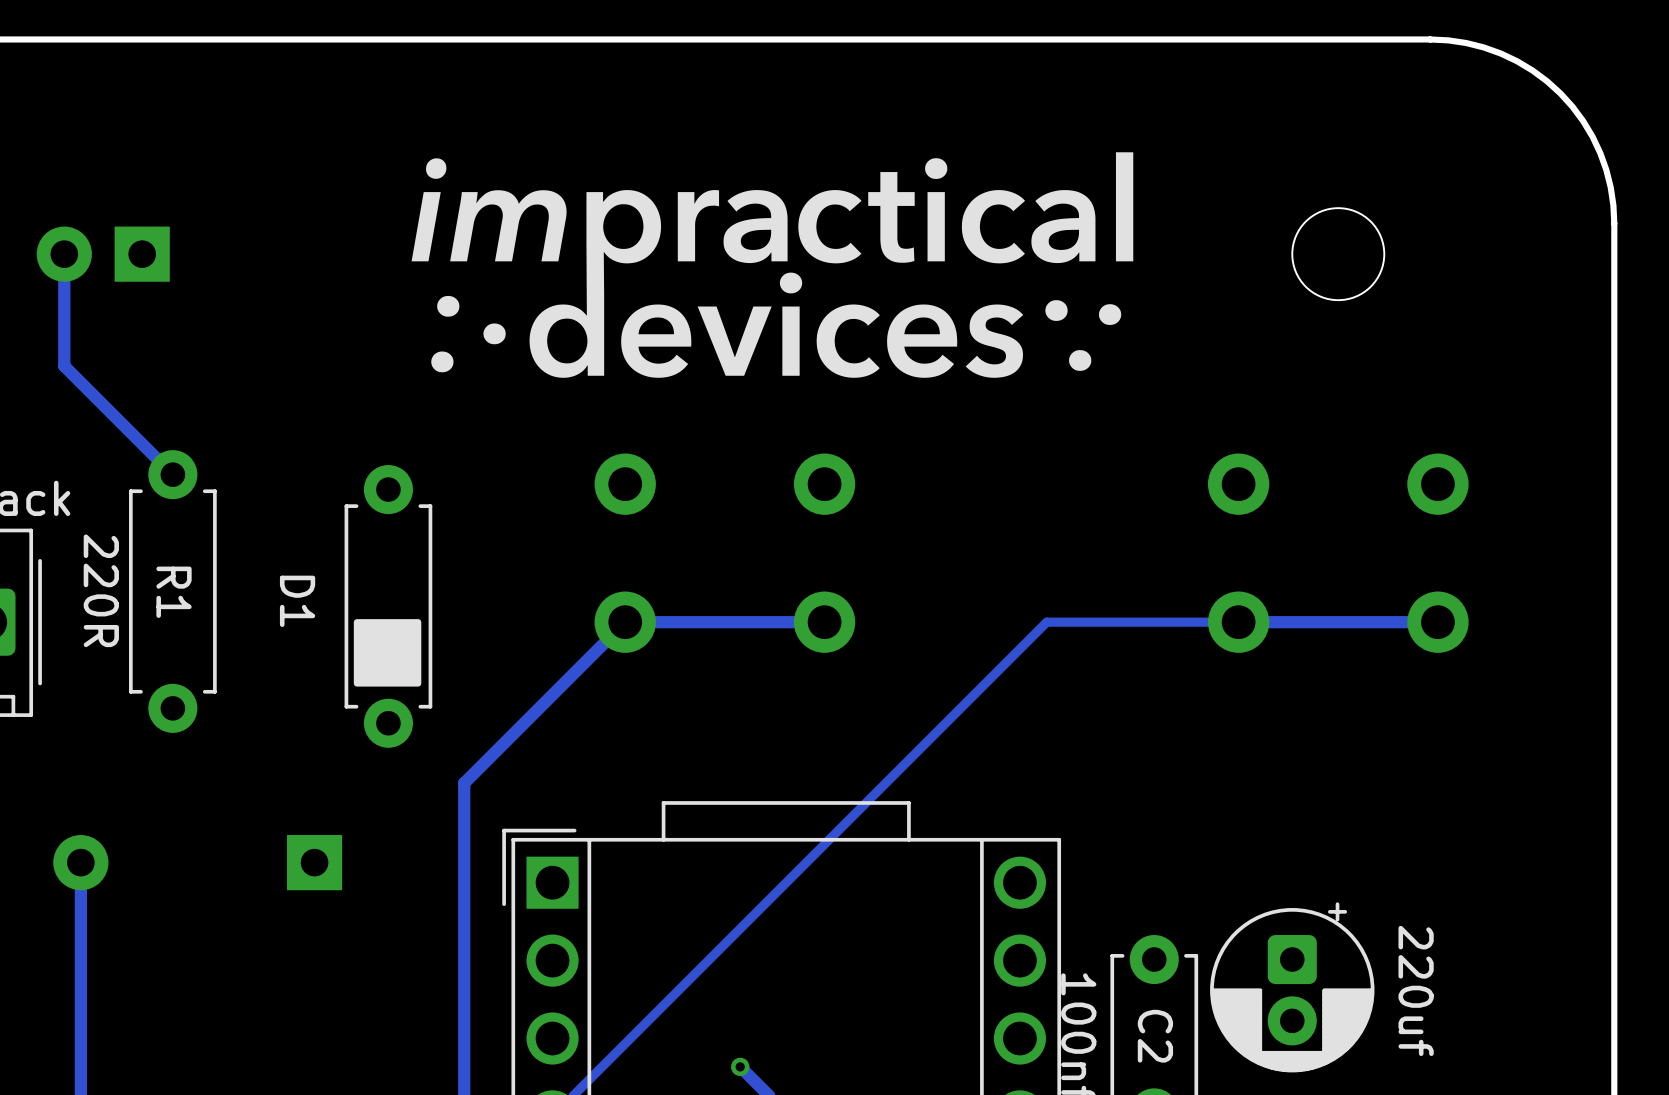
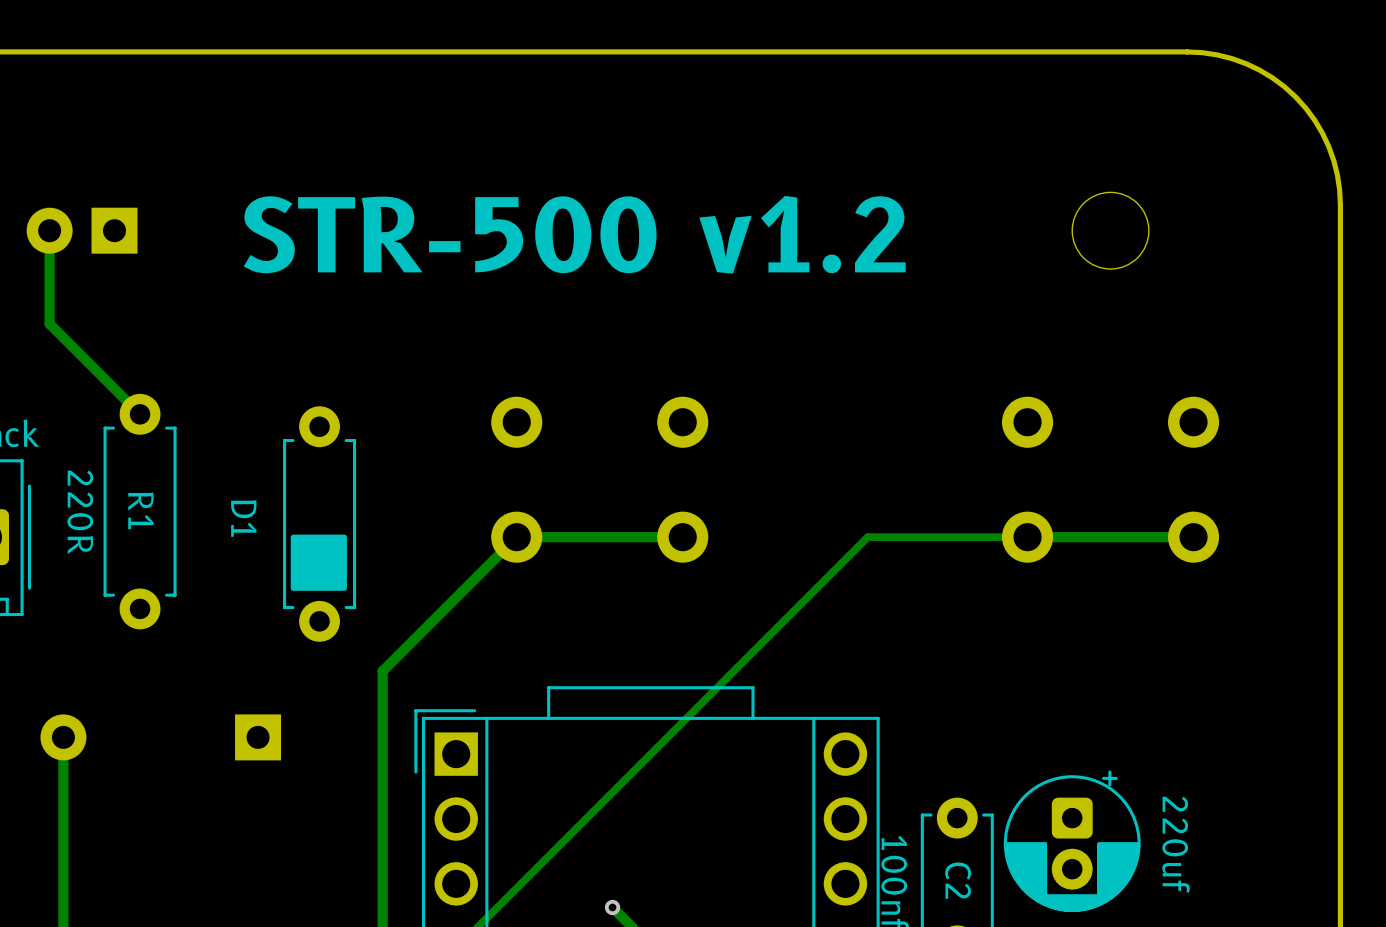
drawing: [411, 152, 1134, 378] -> none
text: none -> STR-500 v1.2 (574, 234)

